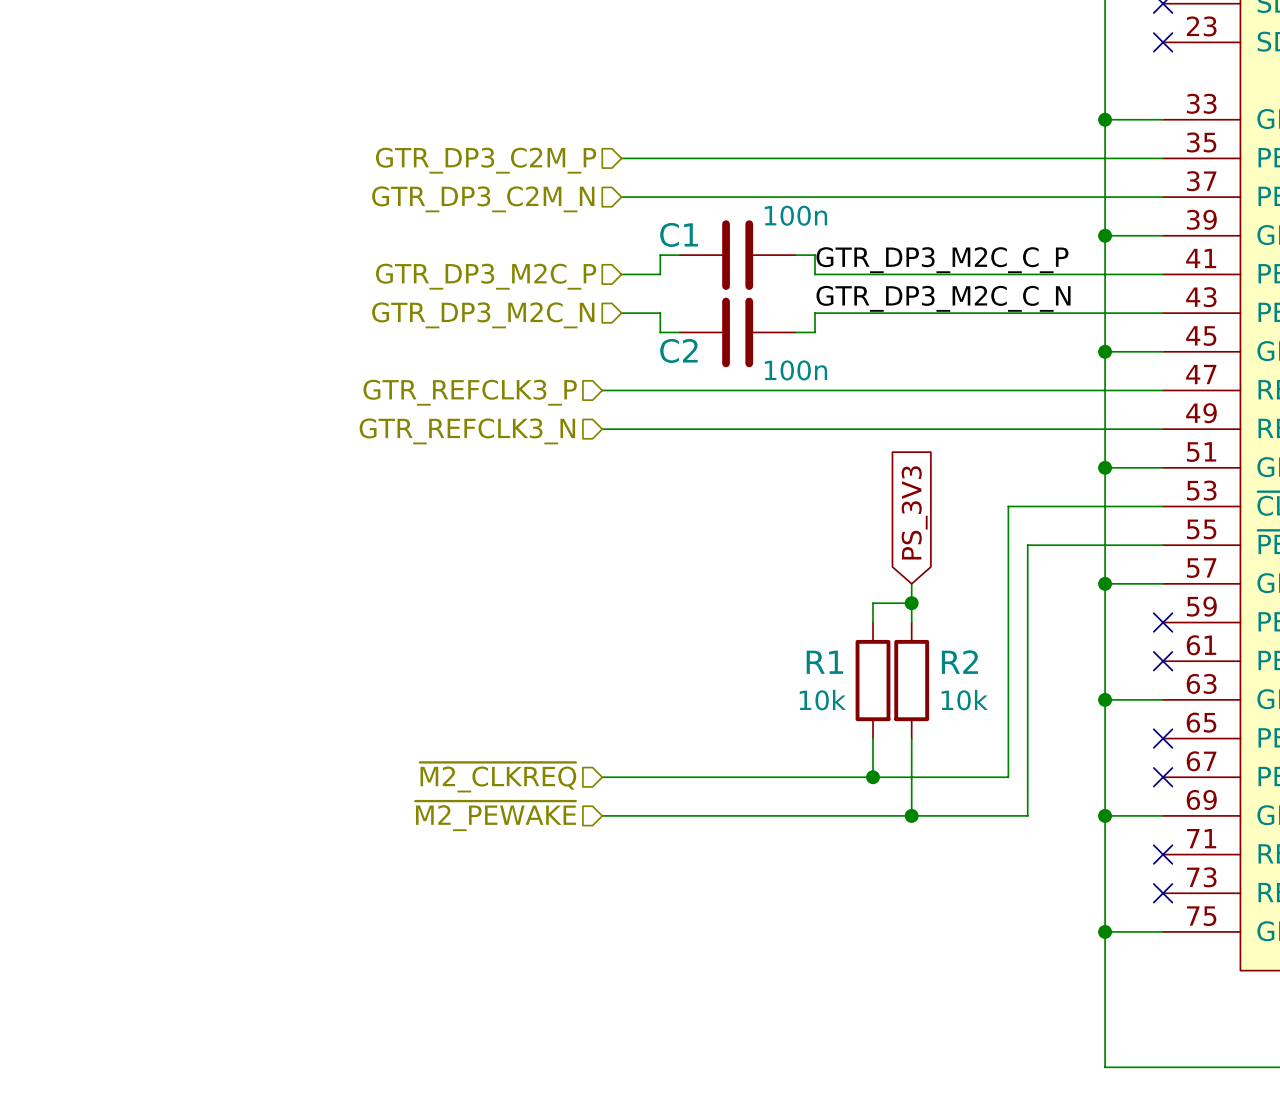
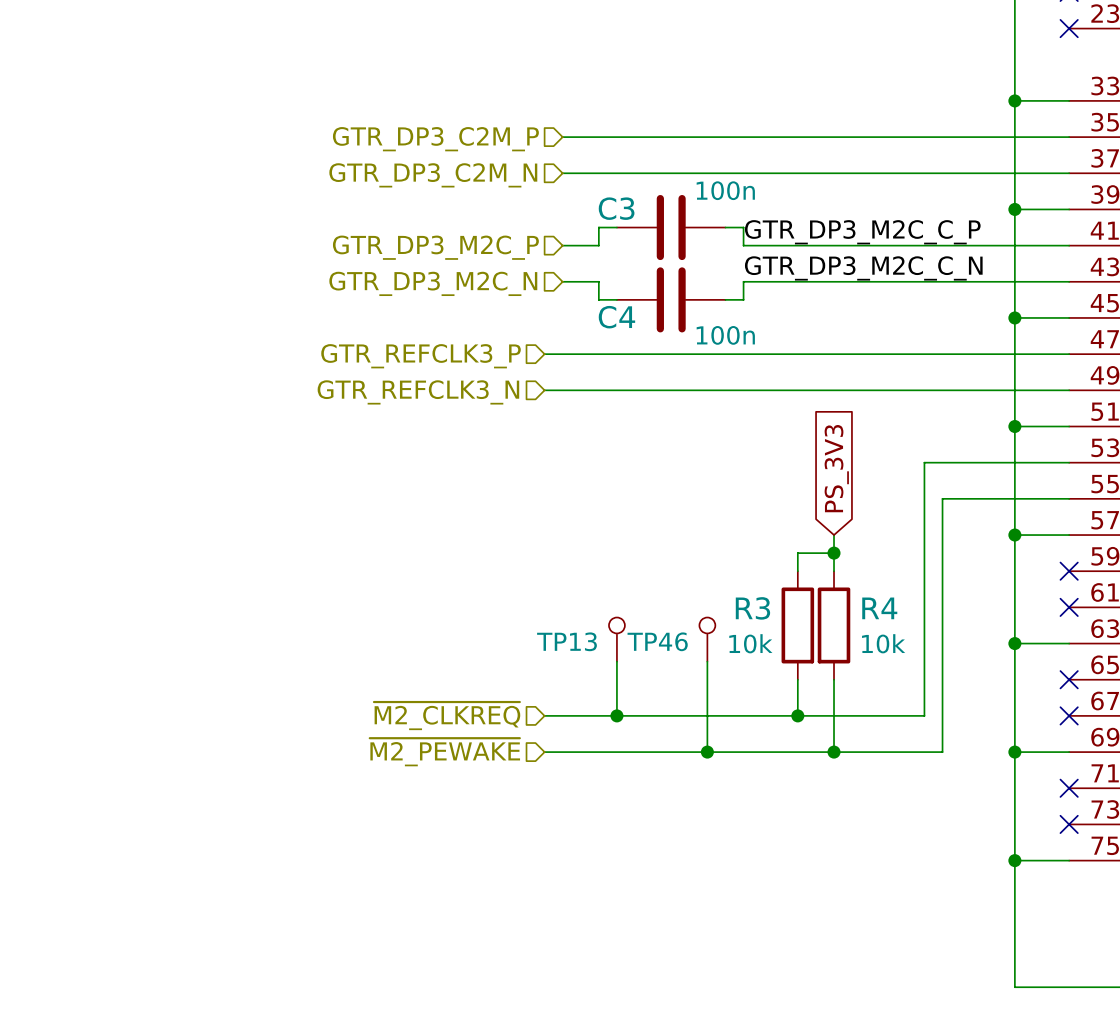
C1 name: C1 (679, 234) -> C3 (616, 208)
C2 name: C2 (678, 350) -> C4 (616, 317)
R1 name: R1 (824, 662) -> R3 (752, 608)
R2 name: R2 (959, 662) -> R4 (879, 608)
TP13: none -> (616, 639)
TP46: none -> (707, 639)
wire: none -> (616, 661) (616, 715)
wire: none -> (707, 661) (707, 752)
junction: none -> (616, 715)
junction: none -> (707, 752)

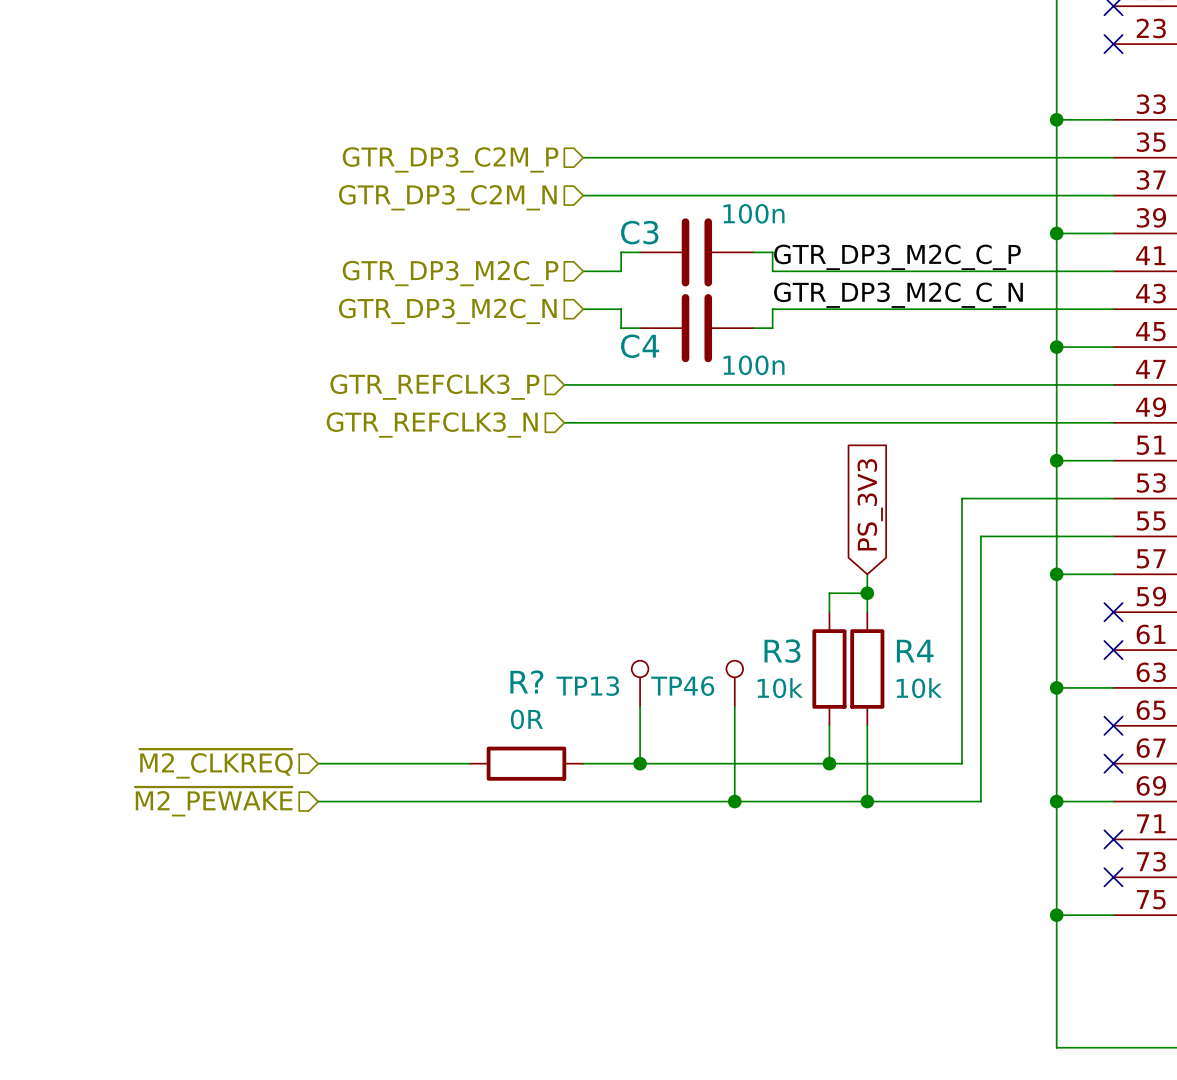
wire: none -> (318, 763) (469, 763)
R?: none -> (526, 763)
hierarchical label position: ~{M2_CLKREQ} (447, 716) -> ~{M2_CLKREQ} (216, 763)
wire: none -> (318, 801) (564, 801)
hierarchical label position: ~{M2_PEWAKE} (444, 752) -> ~{M2_PEWAKE} (213, 801)

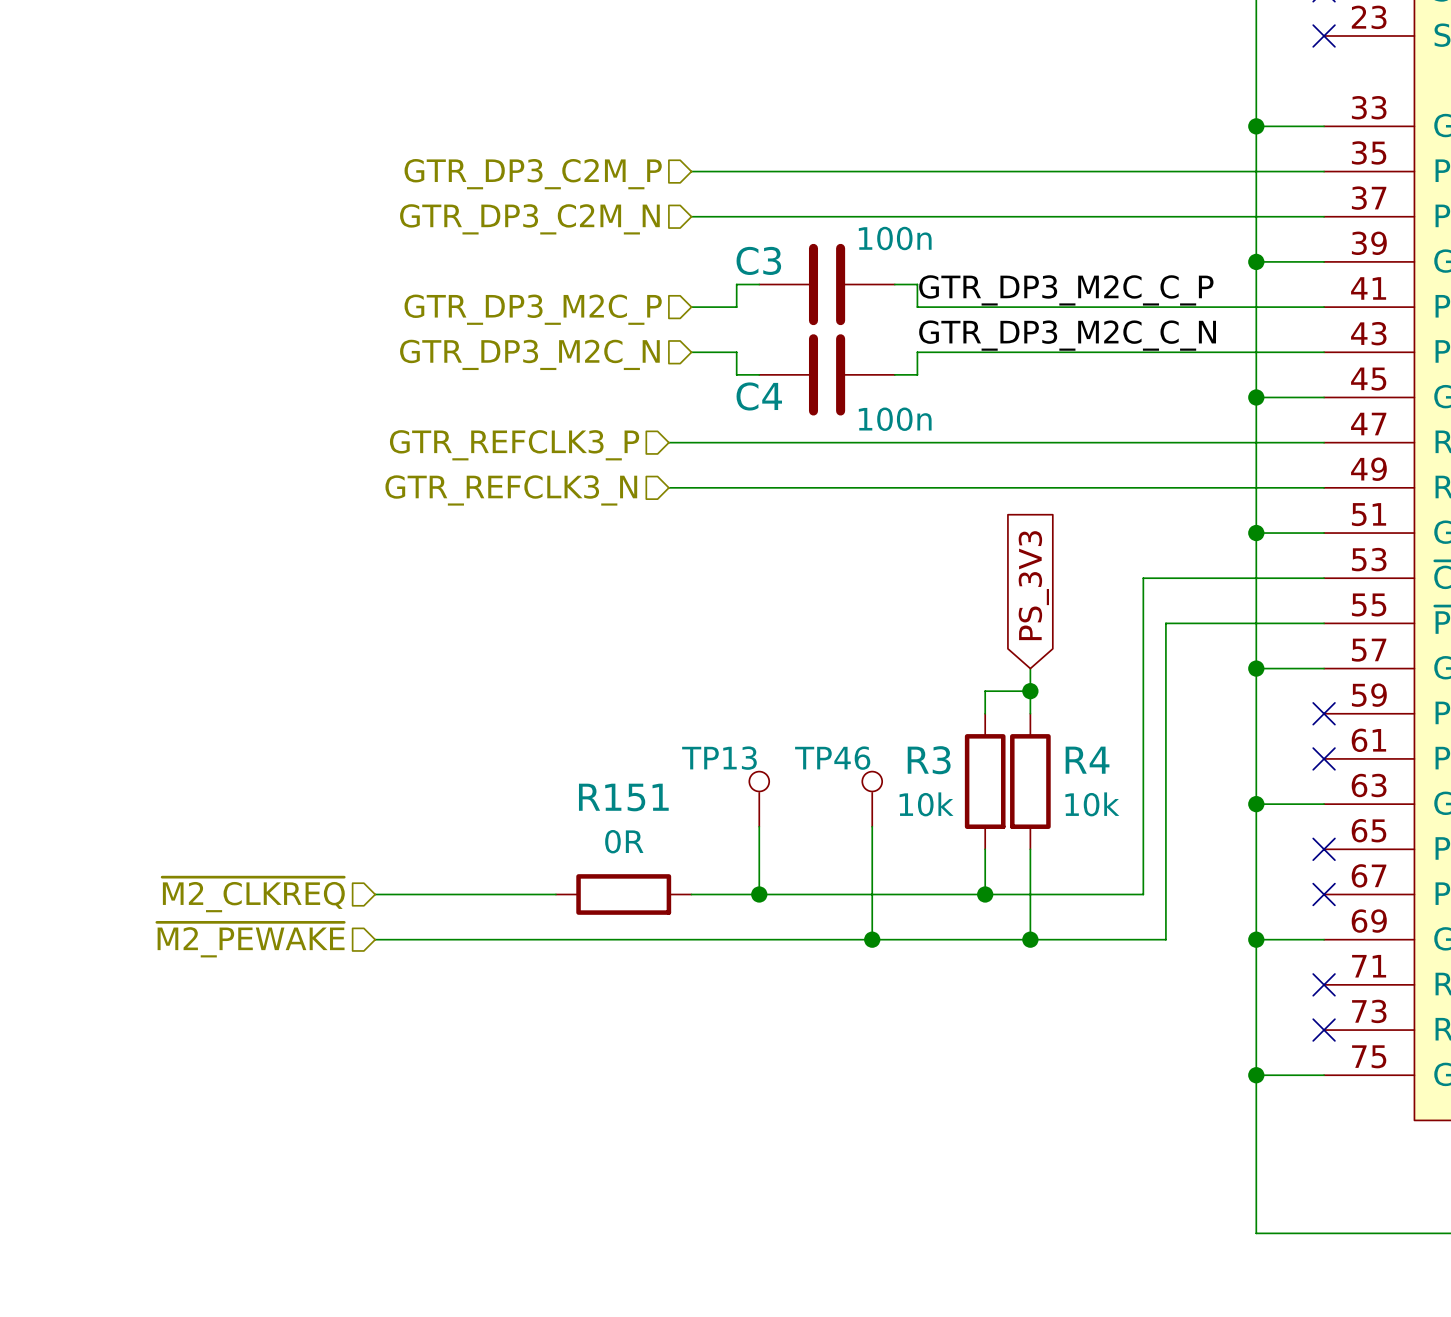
R? name: R? (526, 681) -> R151 (623, 797)
TP13 name position: TP13 (587, 686) -> TP13 (719, 758)
TP46 name position: TP46 (682, 686) -> TP46 (832, 758)

